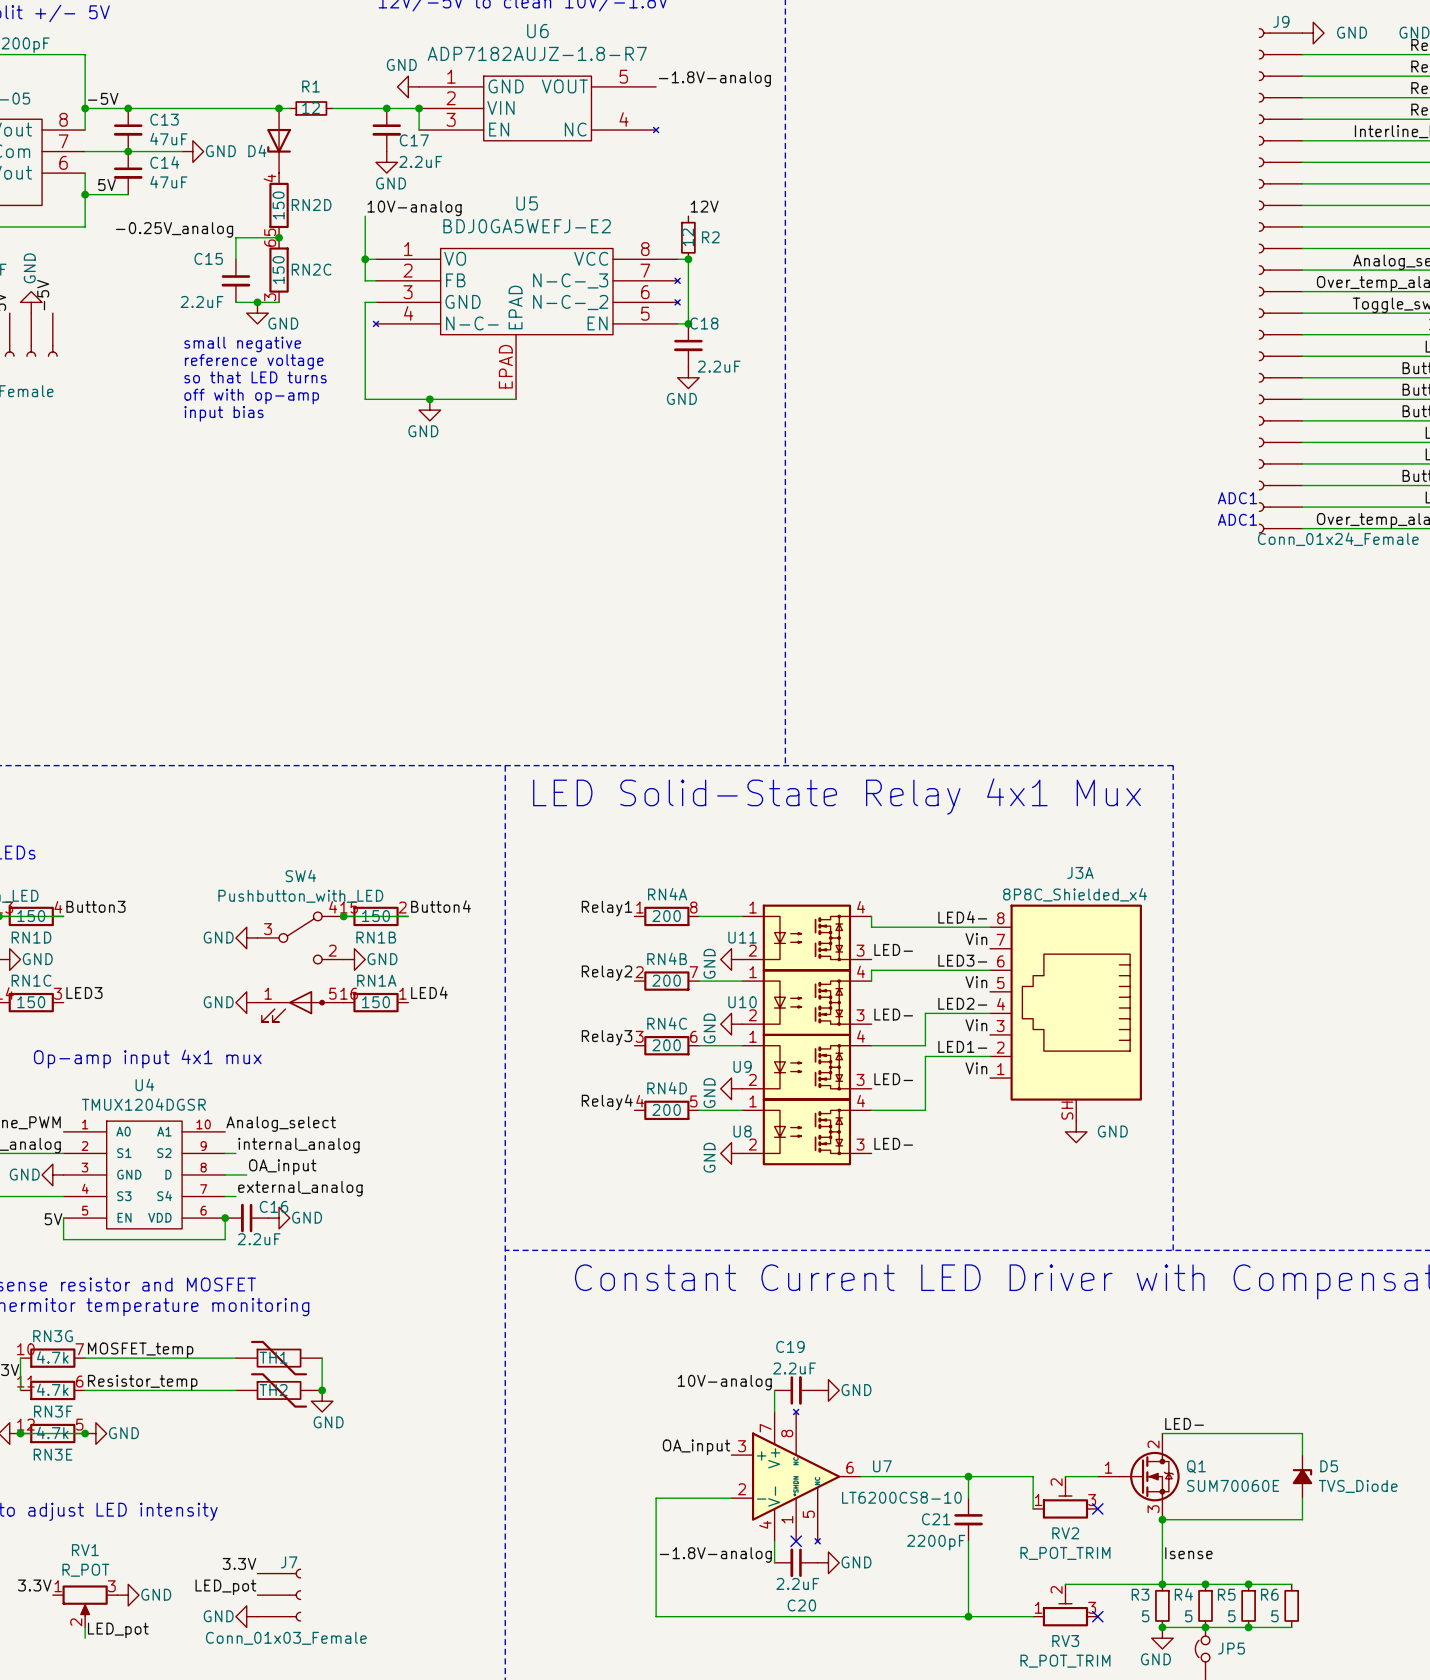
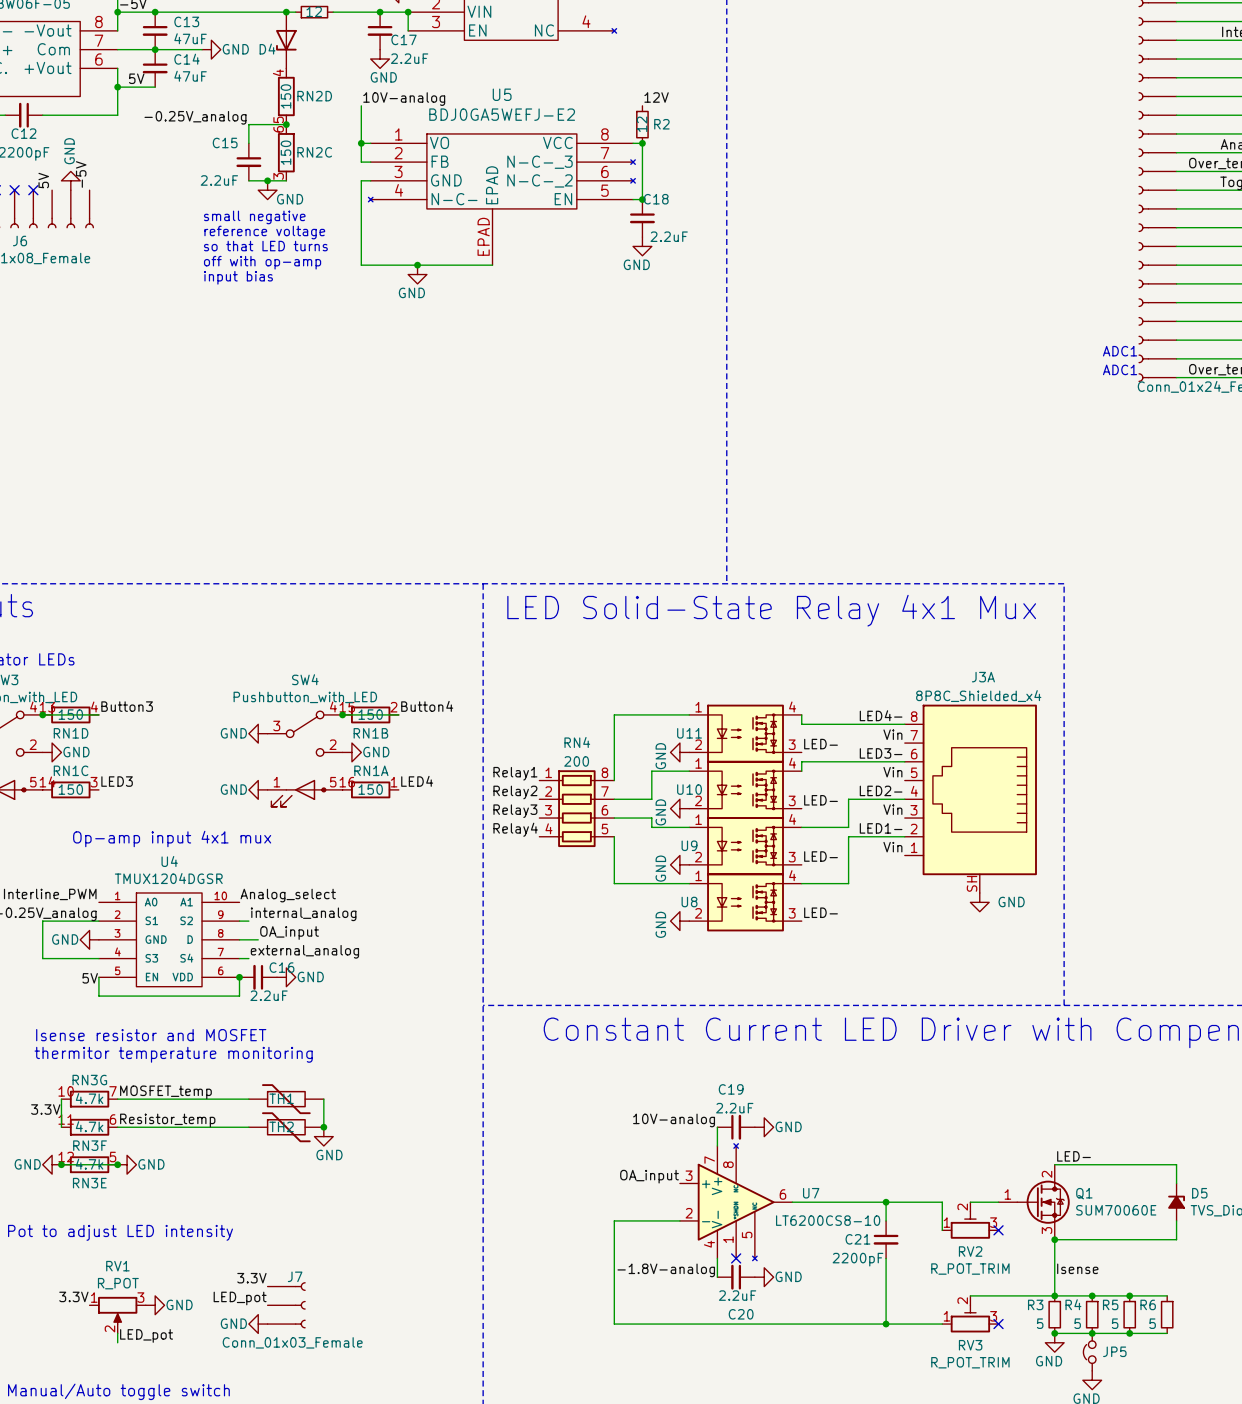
label position: Relay1 (607, 908) -> Relay1 (515, 773)
RN4A: 200 (666, 916) -> none
wire: none -> (651, 714) (614, 714) (614, 780)
label position: Relay2 (607, 973) -> Relay2 (515, 792)
RN4B: 200 (666, 981) -> none
wire: none -> (651, 771) (651, 799) (614, 799)
RN4: none -> 200 (576, 808)
wire: none -> (614, 818) (651, 818) (651, 827)
label position: Relay3 (607, 1037) -> Relay3 (515, 811)
RN4C: 200 (666, 1045) -> none
wire: none -> (614, 836) (614, 883) (651, 883)
label position: Relay4 (607, 1102) -> Relay4 (515, 829)
RN4D: 200 (666, 1110) -> none

